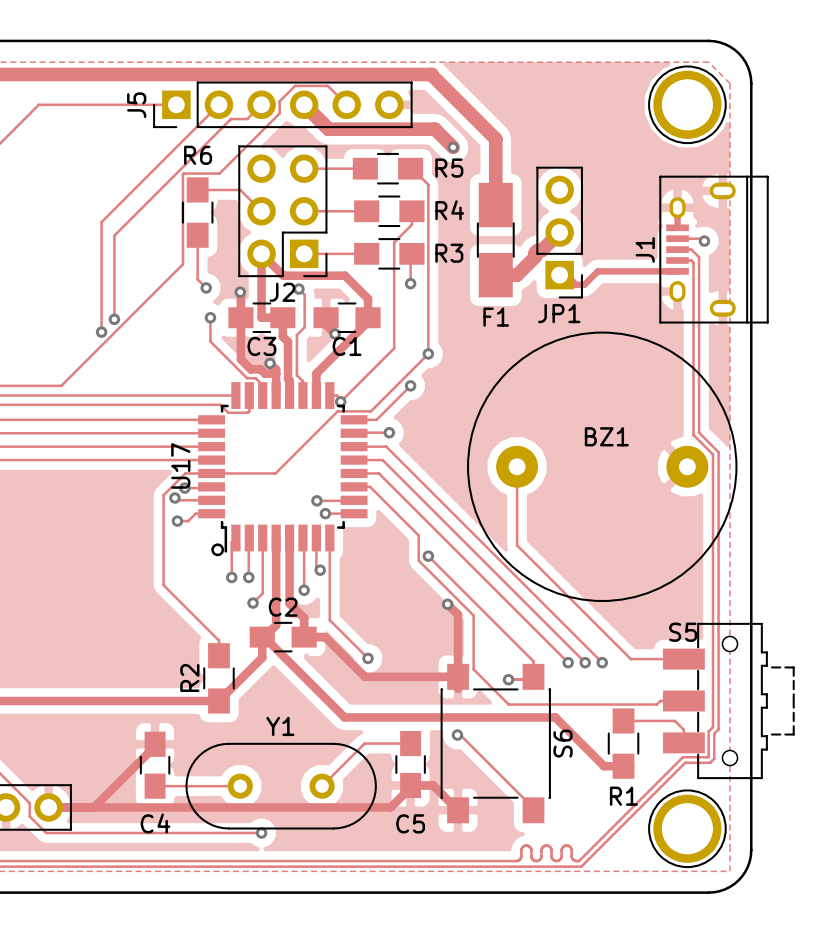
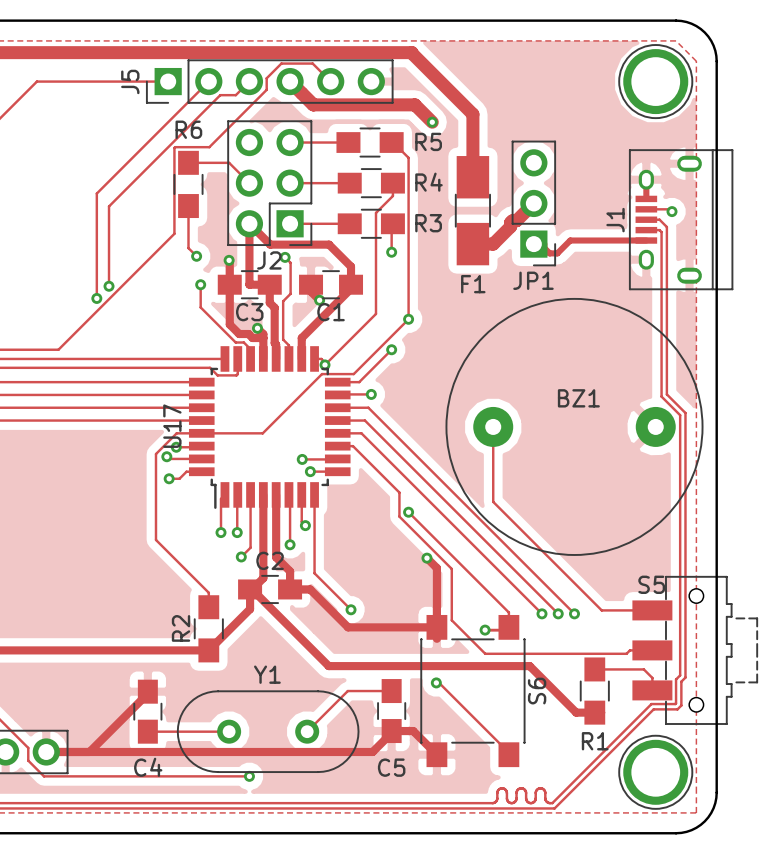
U17 footprint: [198, 382, 368, 557] -> [188, 346, 351, 509]

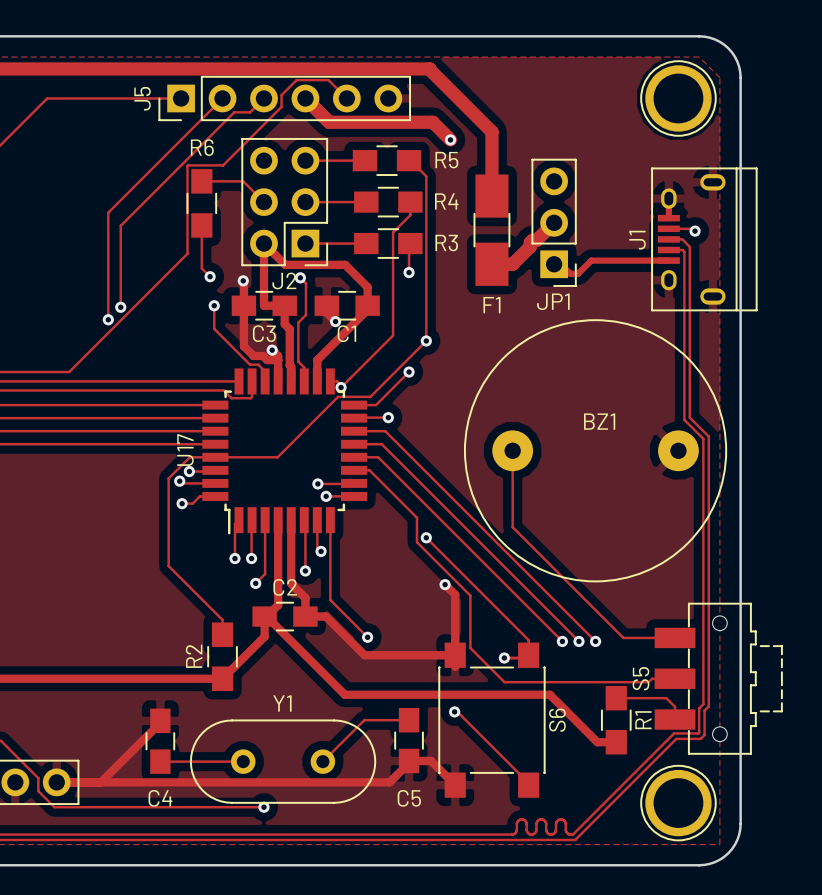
S5 name rotation: 0° (651, 584) -> 90° counterclockwise (640, 678)
S5 name position: S5 (651, 584) -> S5 (640, 678)
R1 name rotation: 0° (595, 741) -> 90° counterclockwise (643, 720)
R1 name position: R1 (595, 741) -> R1 (643, 720)

